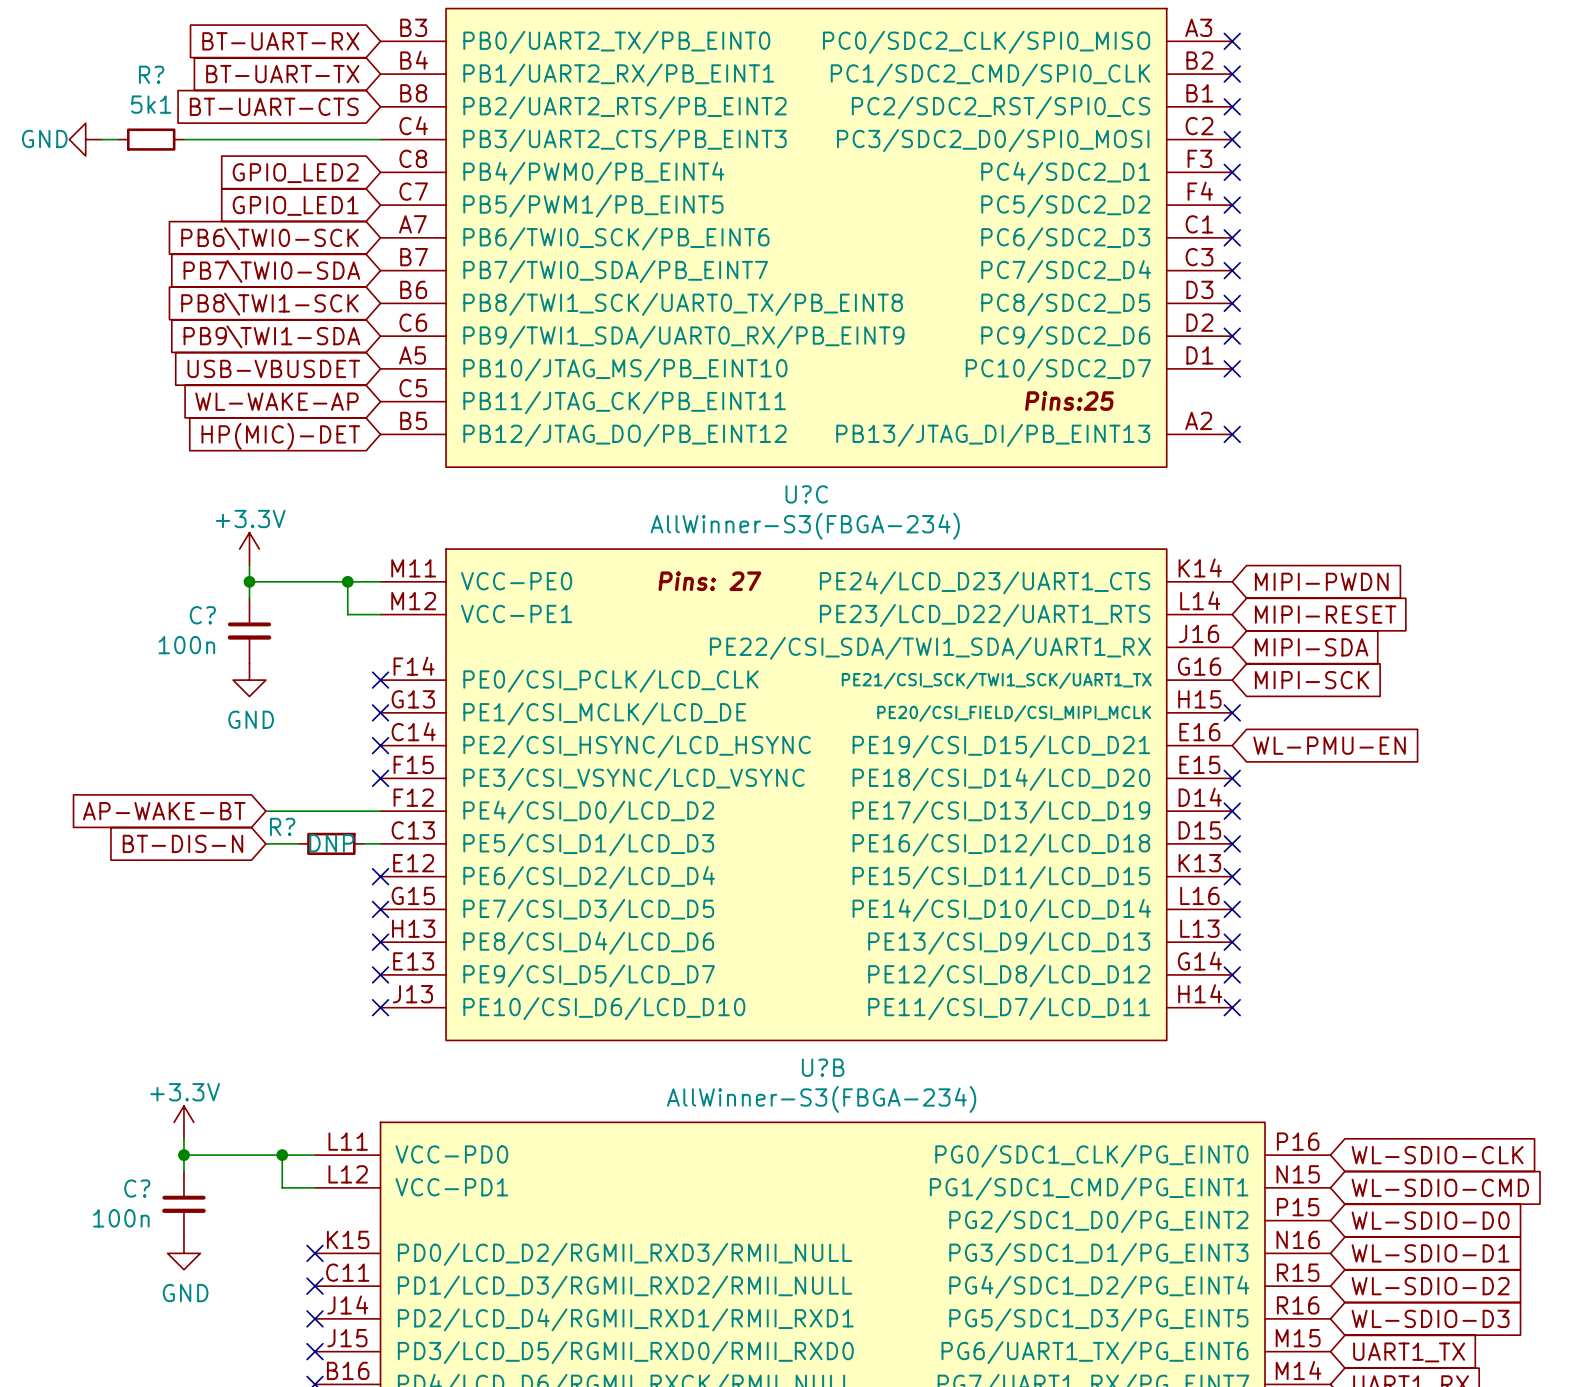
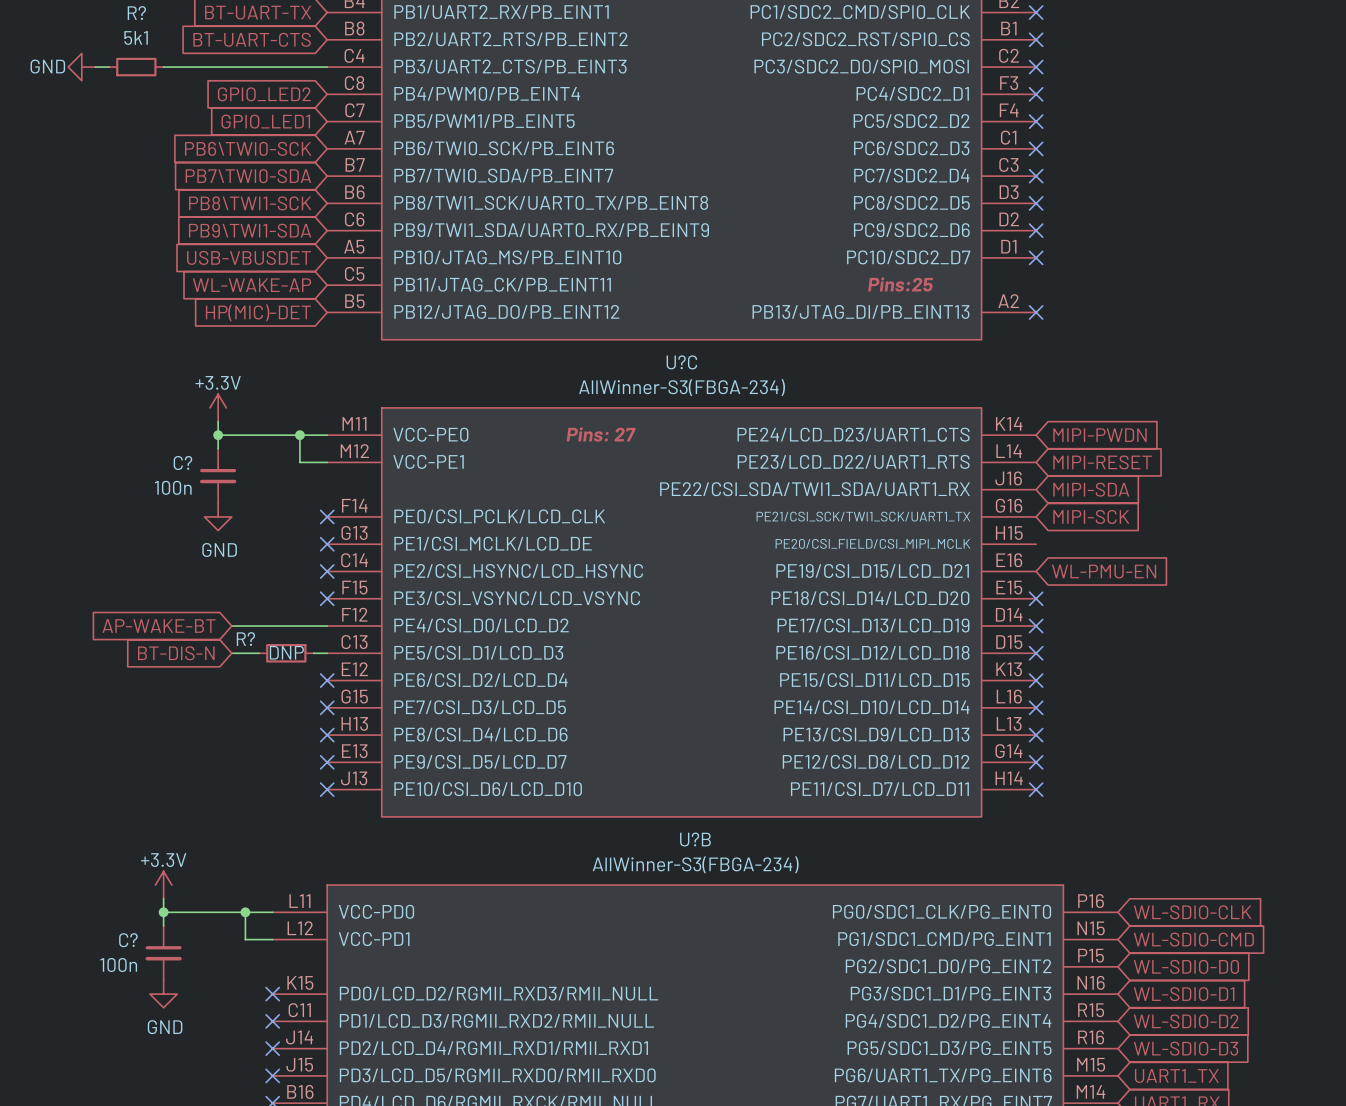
no-connect mark: (1232, 712) -> none

